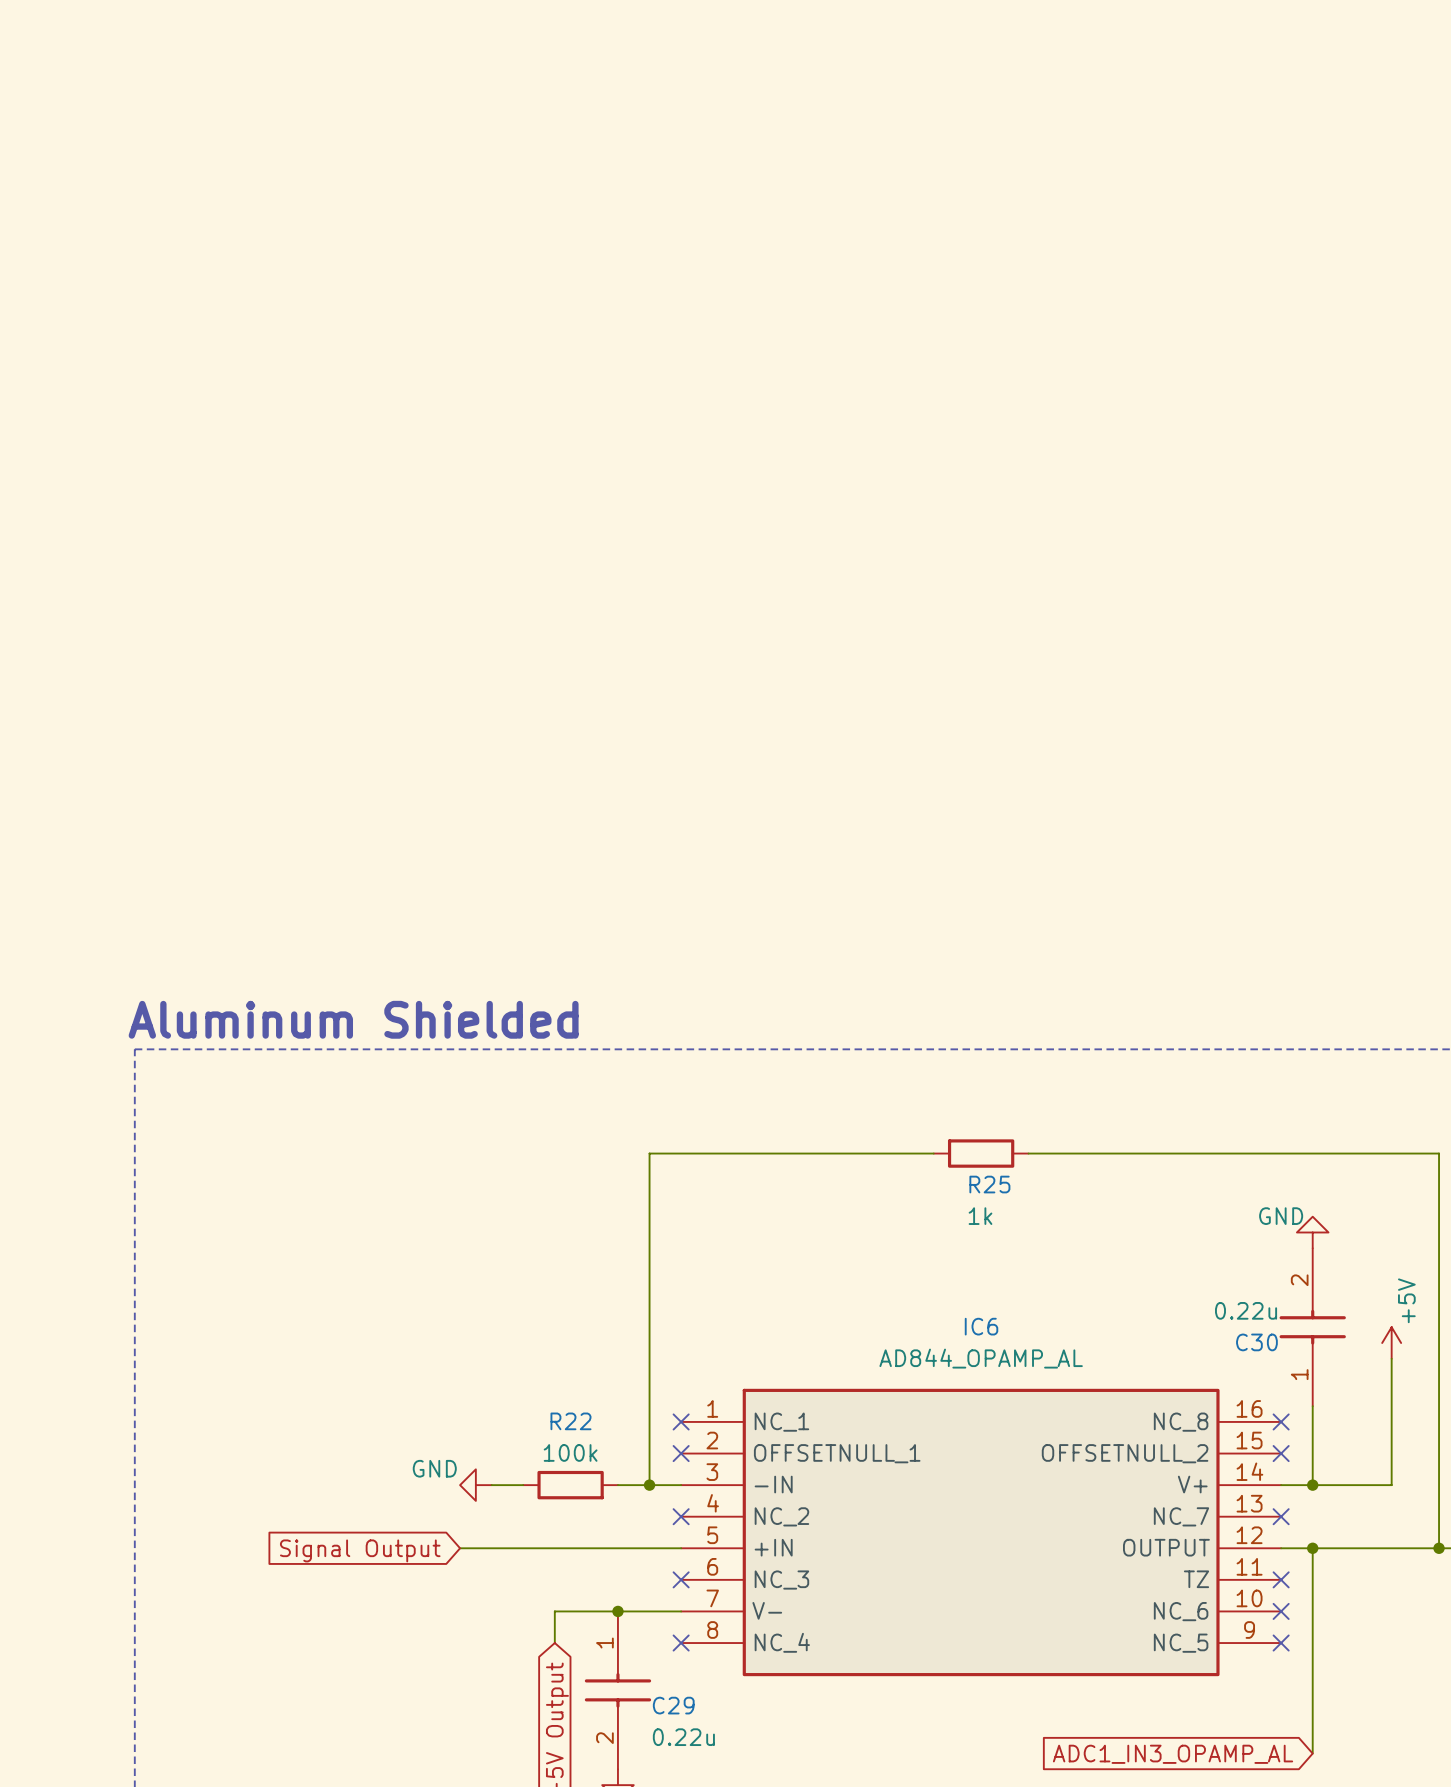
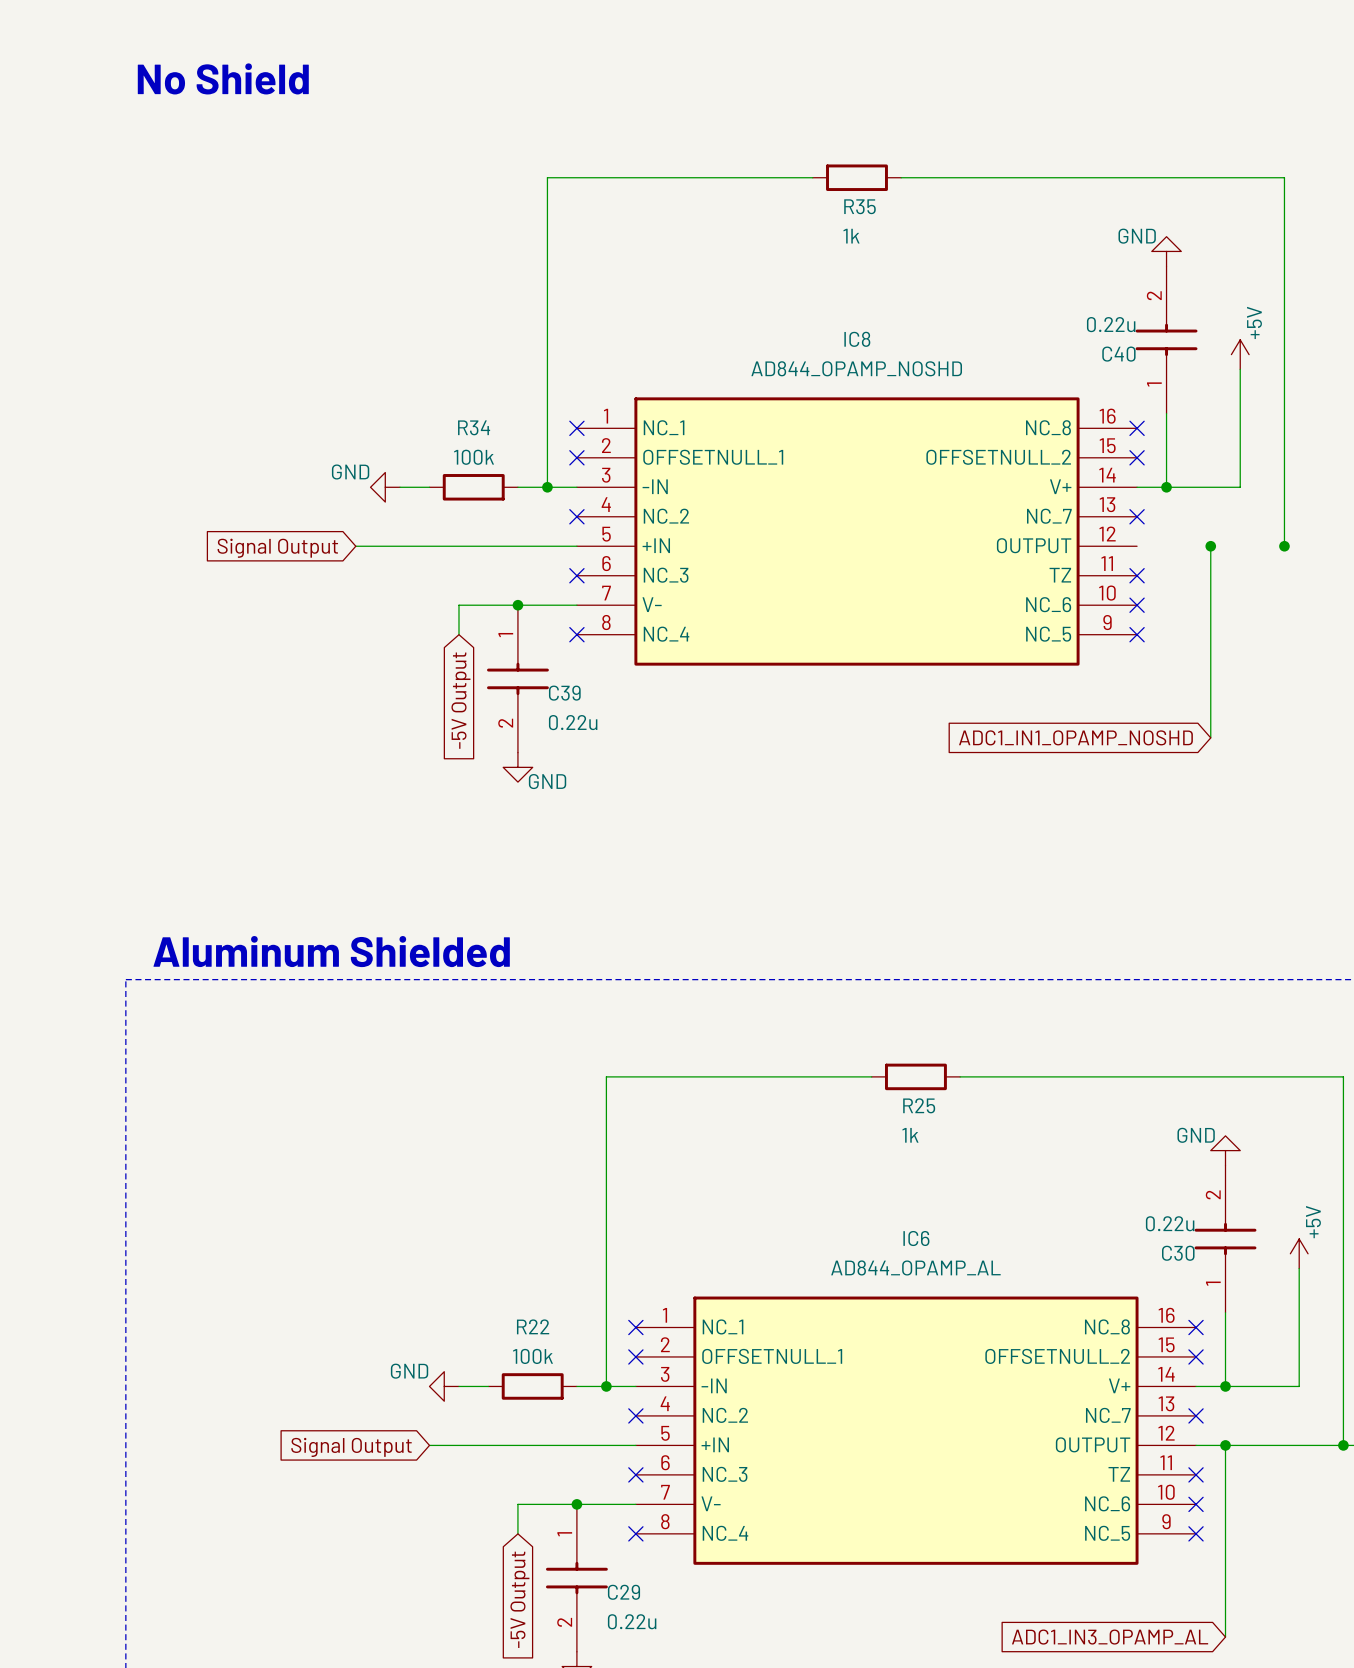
text: none -> No Shield (223, 78)
wire: none -> (812, 177) (547, 177) (547, 487)
R35: none -> 1k (856, 177)
wire: none -> (901, 177) (1284, 177) (1284, 546)
power symbol: none -> GND (1166, 251)
C40: none -> 0.22u (1166, 339)
power symbol: none -> +5V (1240, 354)
wire: none -> (1240, 369) (1240, 487) (1137, 487)
wire: none -> (1166, 413) (1166, 487)
no-connect mark: none -> (576, 428)
no-connect mark: none -> (1137, 428)
no-connect mark: none -> (576, 457)
no-connect mark: none -> (1137, 457)
power symbol: none -> GND (385, 487)
wire: none -> (400, 487) (429, 487)
R34: none -> 100k (473, 487)
wire: none -> (517, 487) (576, 487)
junction: none -> (547, 487)
junction: none -> (1166, 487)
no-connect mark: none -> (576, 516)
no-connect mark: none -> (1137, 516)
IC8: none -> AD844_OPAMP_NOSHD (856, 531)
wire: none -> (355, 546) (576, 546)
wire: none -> (1210, 546) (1210, 737)
junction: none -> (1210, 546)
junction: none -> (1284, 546)
global label: none -> Signal Output (277, 548)
no-connect mark: none -> (576, 575)
no-connect mark: none -> (1137, 575)
junction: none -> (517, 605)
wire: none -> (576, 605) (458, 605) (458, 634)
no-connect mark: none -> (1137, 605)
no-connect mark: none -> (576, 634)
no-connect mark: none -> (1137, 634)
C39: none -> 0.22u (517, 678)
global label: none -> -5V Output (460, 700)
global label: none -> ADC1_IN1_OPAMP_NOSHD (1075, 737)
power symbol: none -> GND (517, 767)

